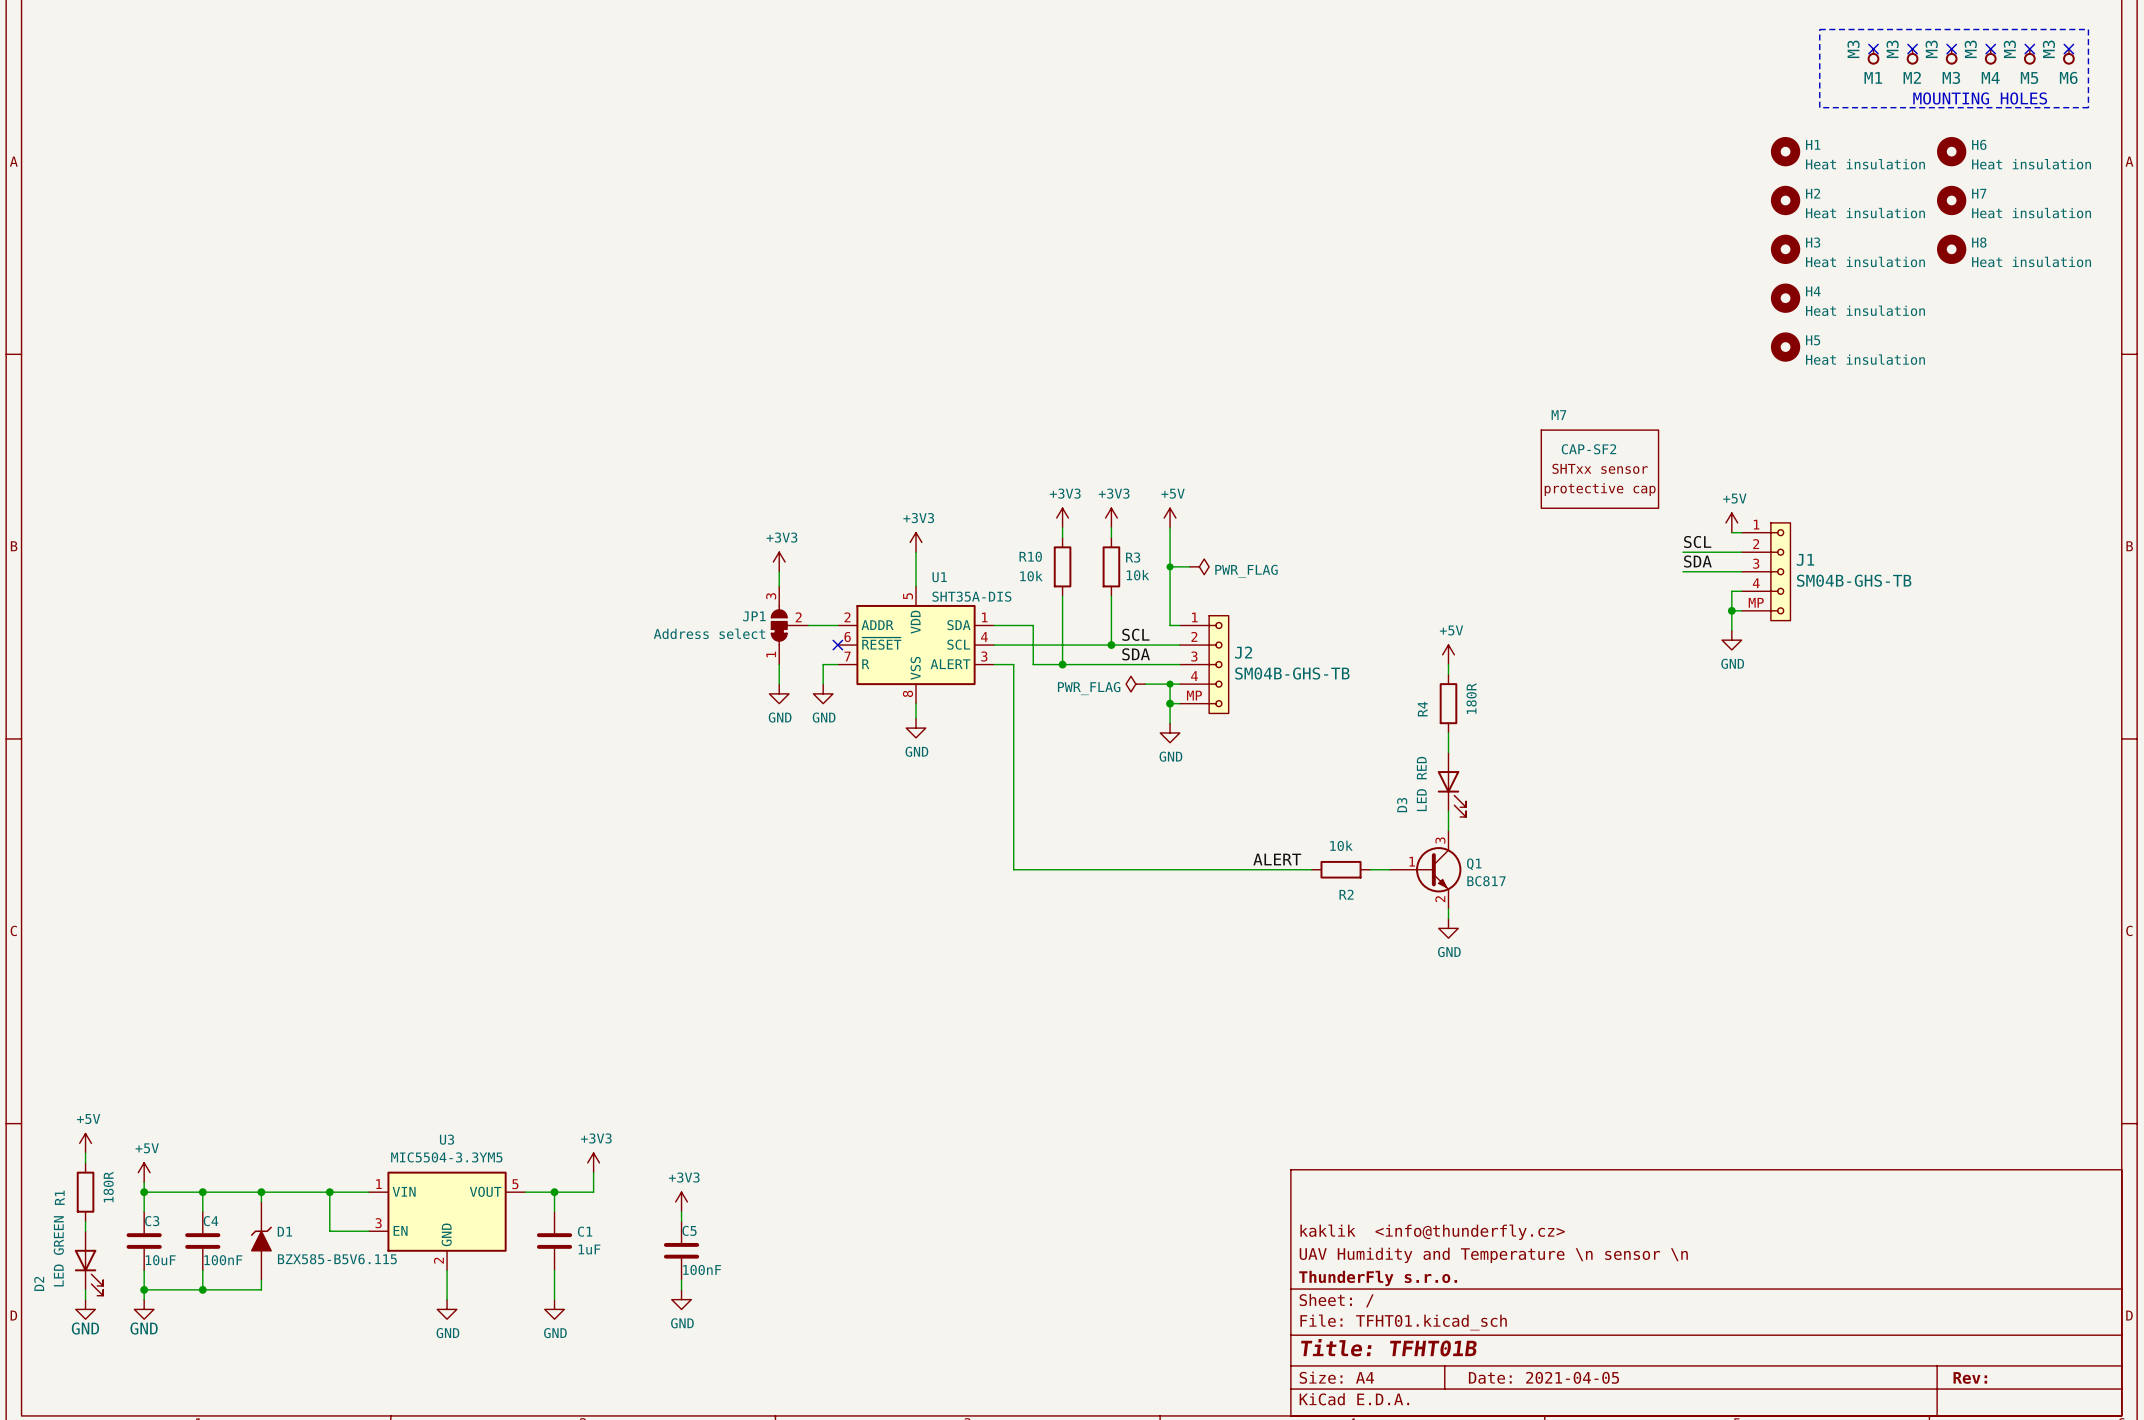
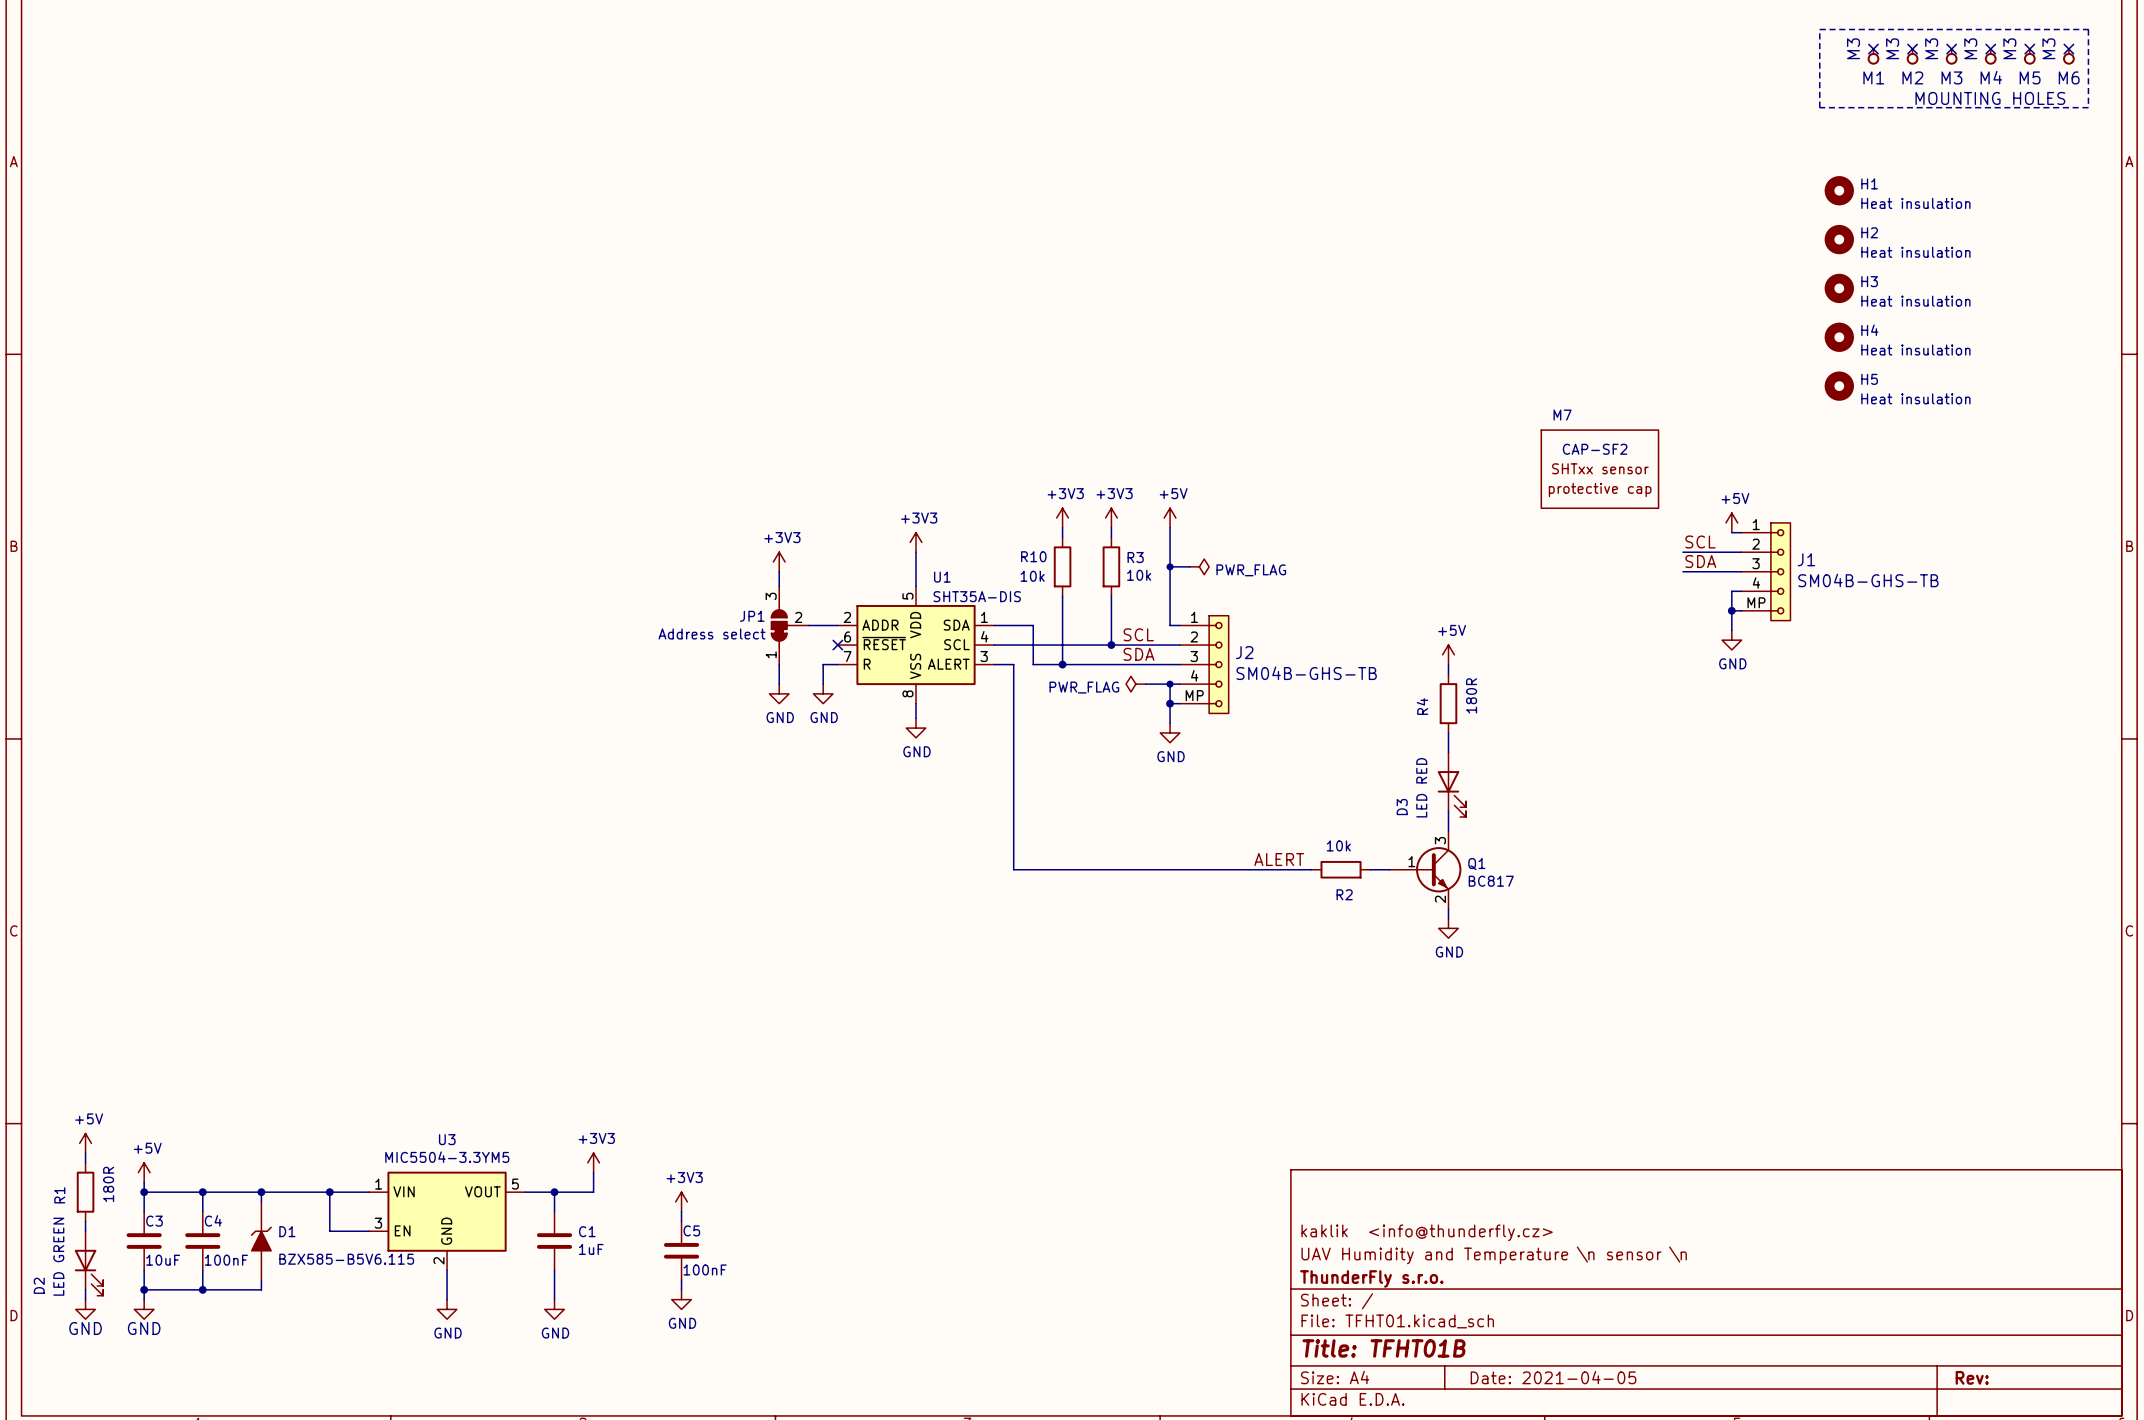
H1 position: (1785, 151) -> (1839, 190)
H6: Heat insulation (1951, 151) -> none
H2 position: (1785, 200) -> (1839, 239)
H7: Heat insulation (1951, 200) -> none
H3 position: (1785, 249) -> (1839, 288)
H8: Heat insulation (1951, 249) -> none
H4 position: (1785, 298) -> (1839, 337)
H5 position: (1785, 347) -> (1839, 386)

